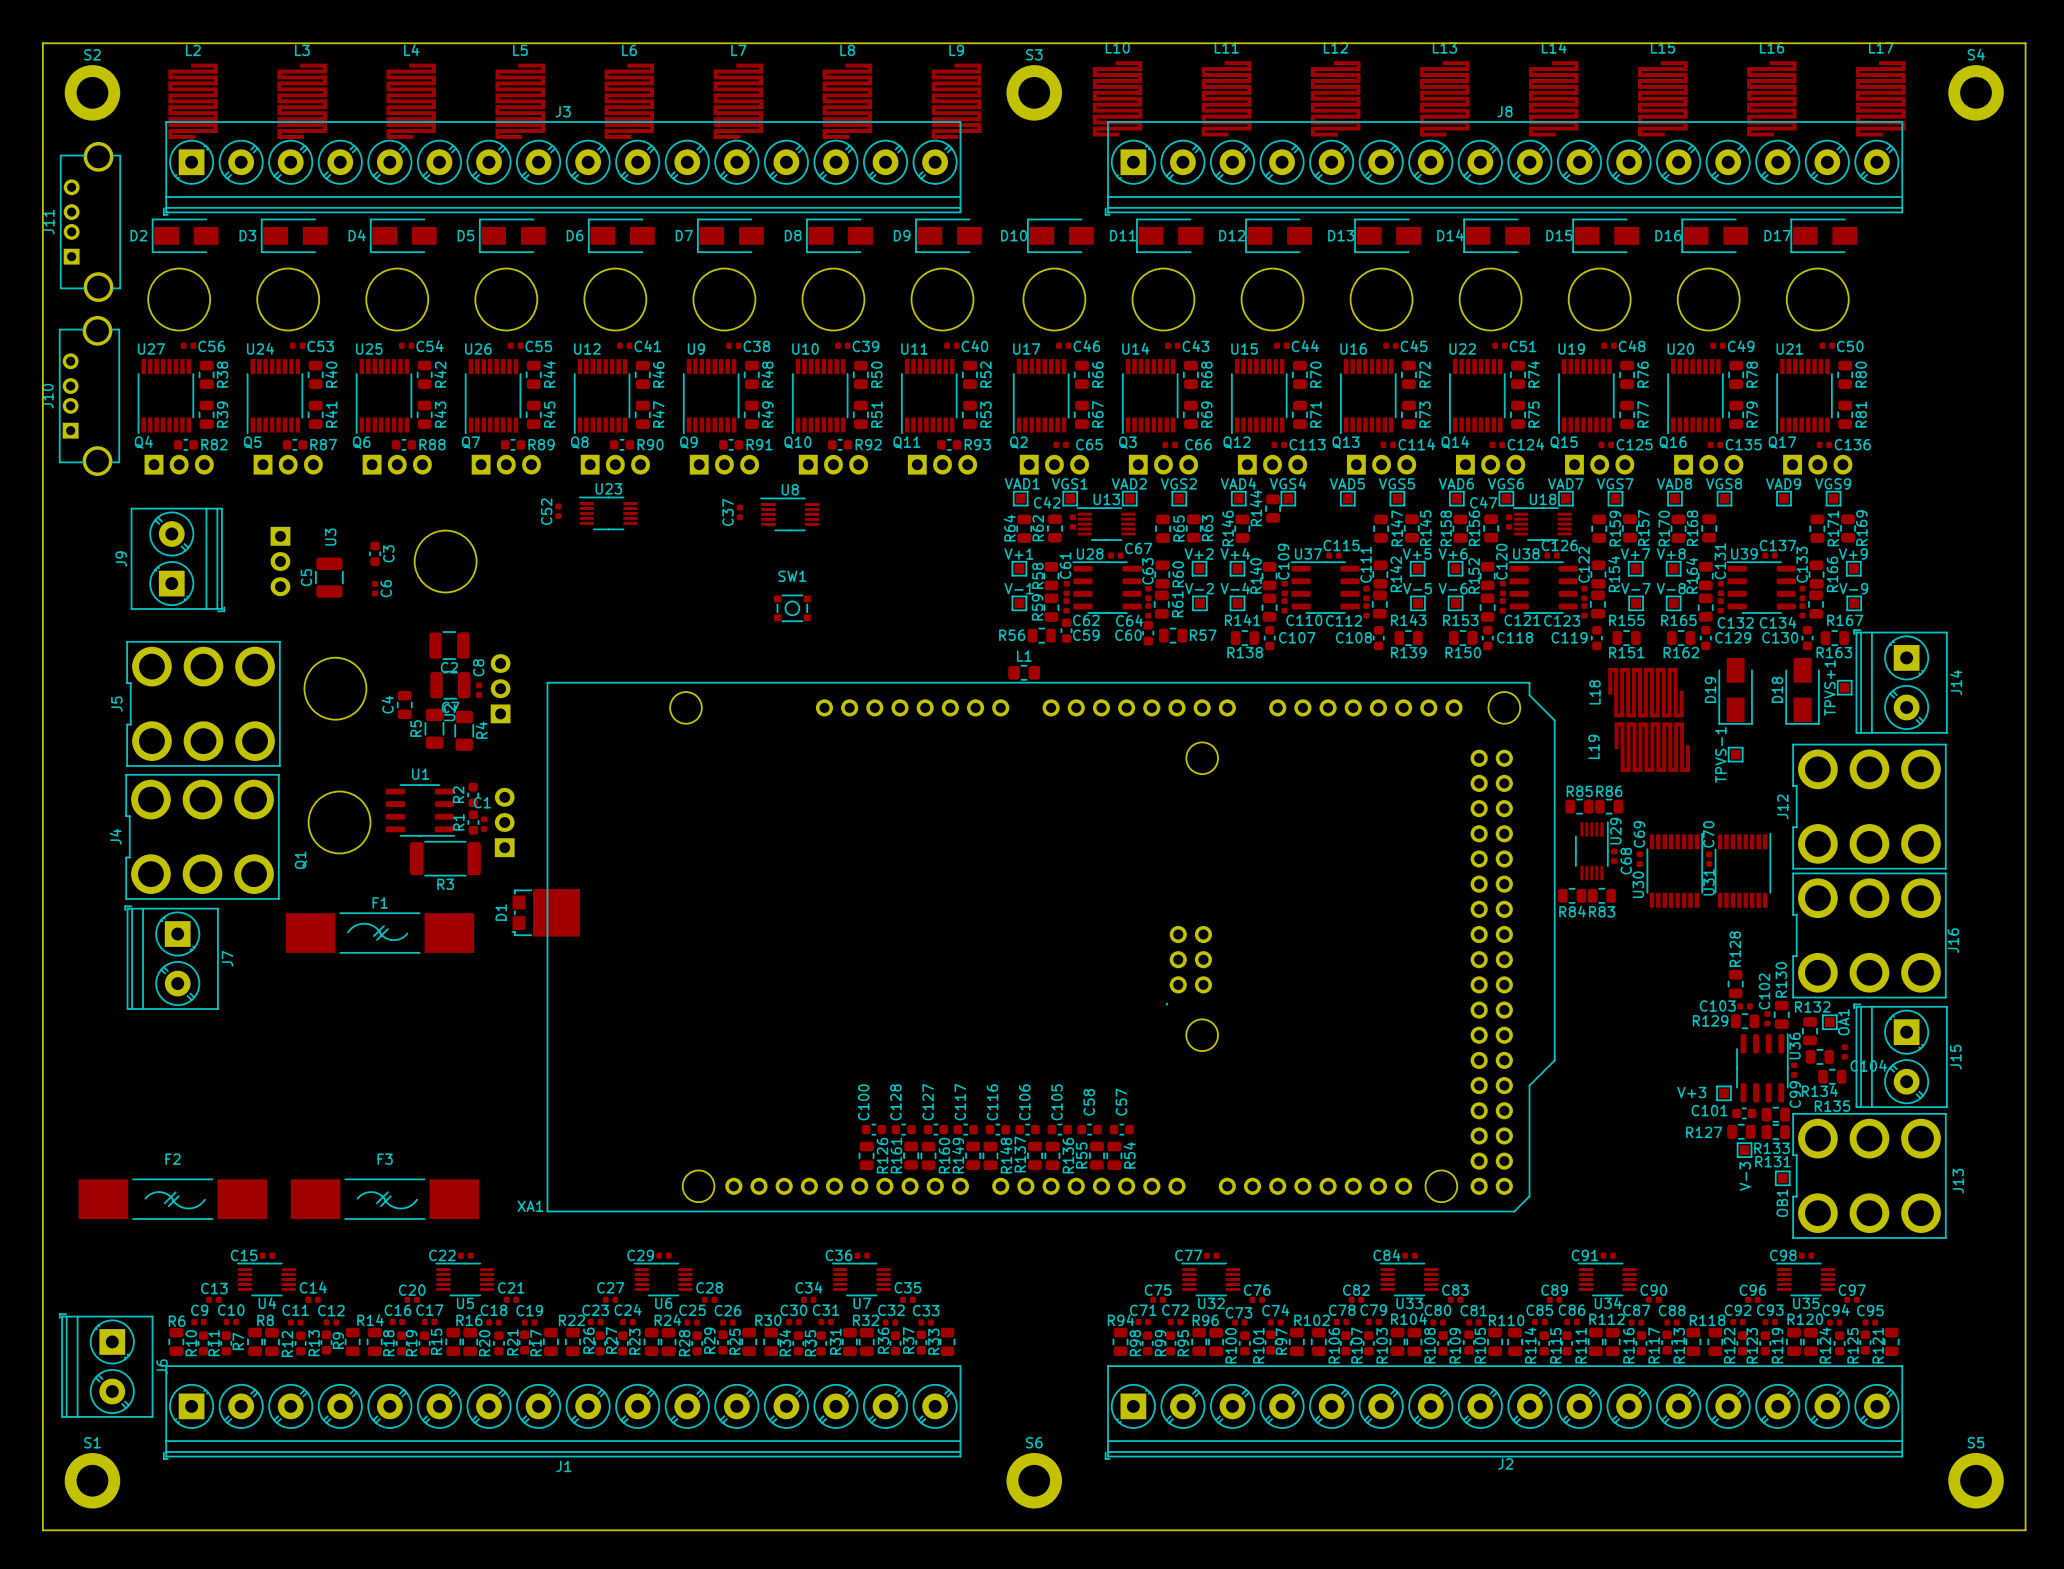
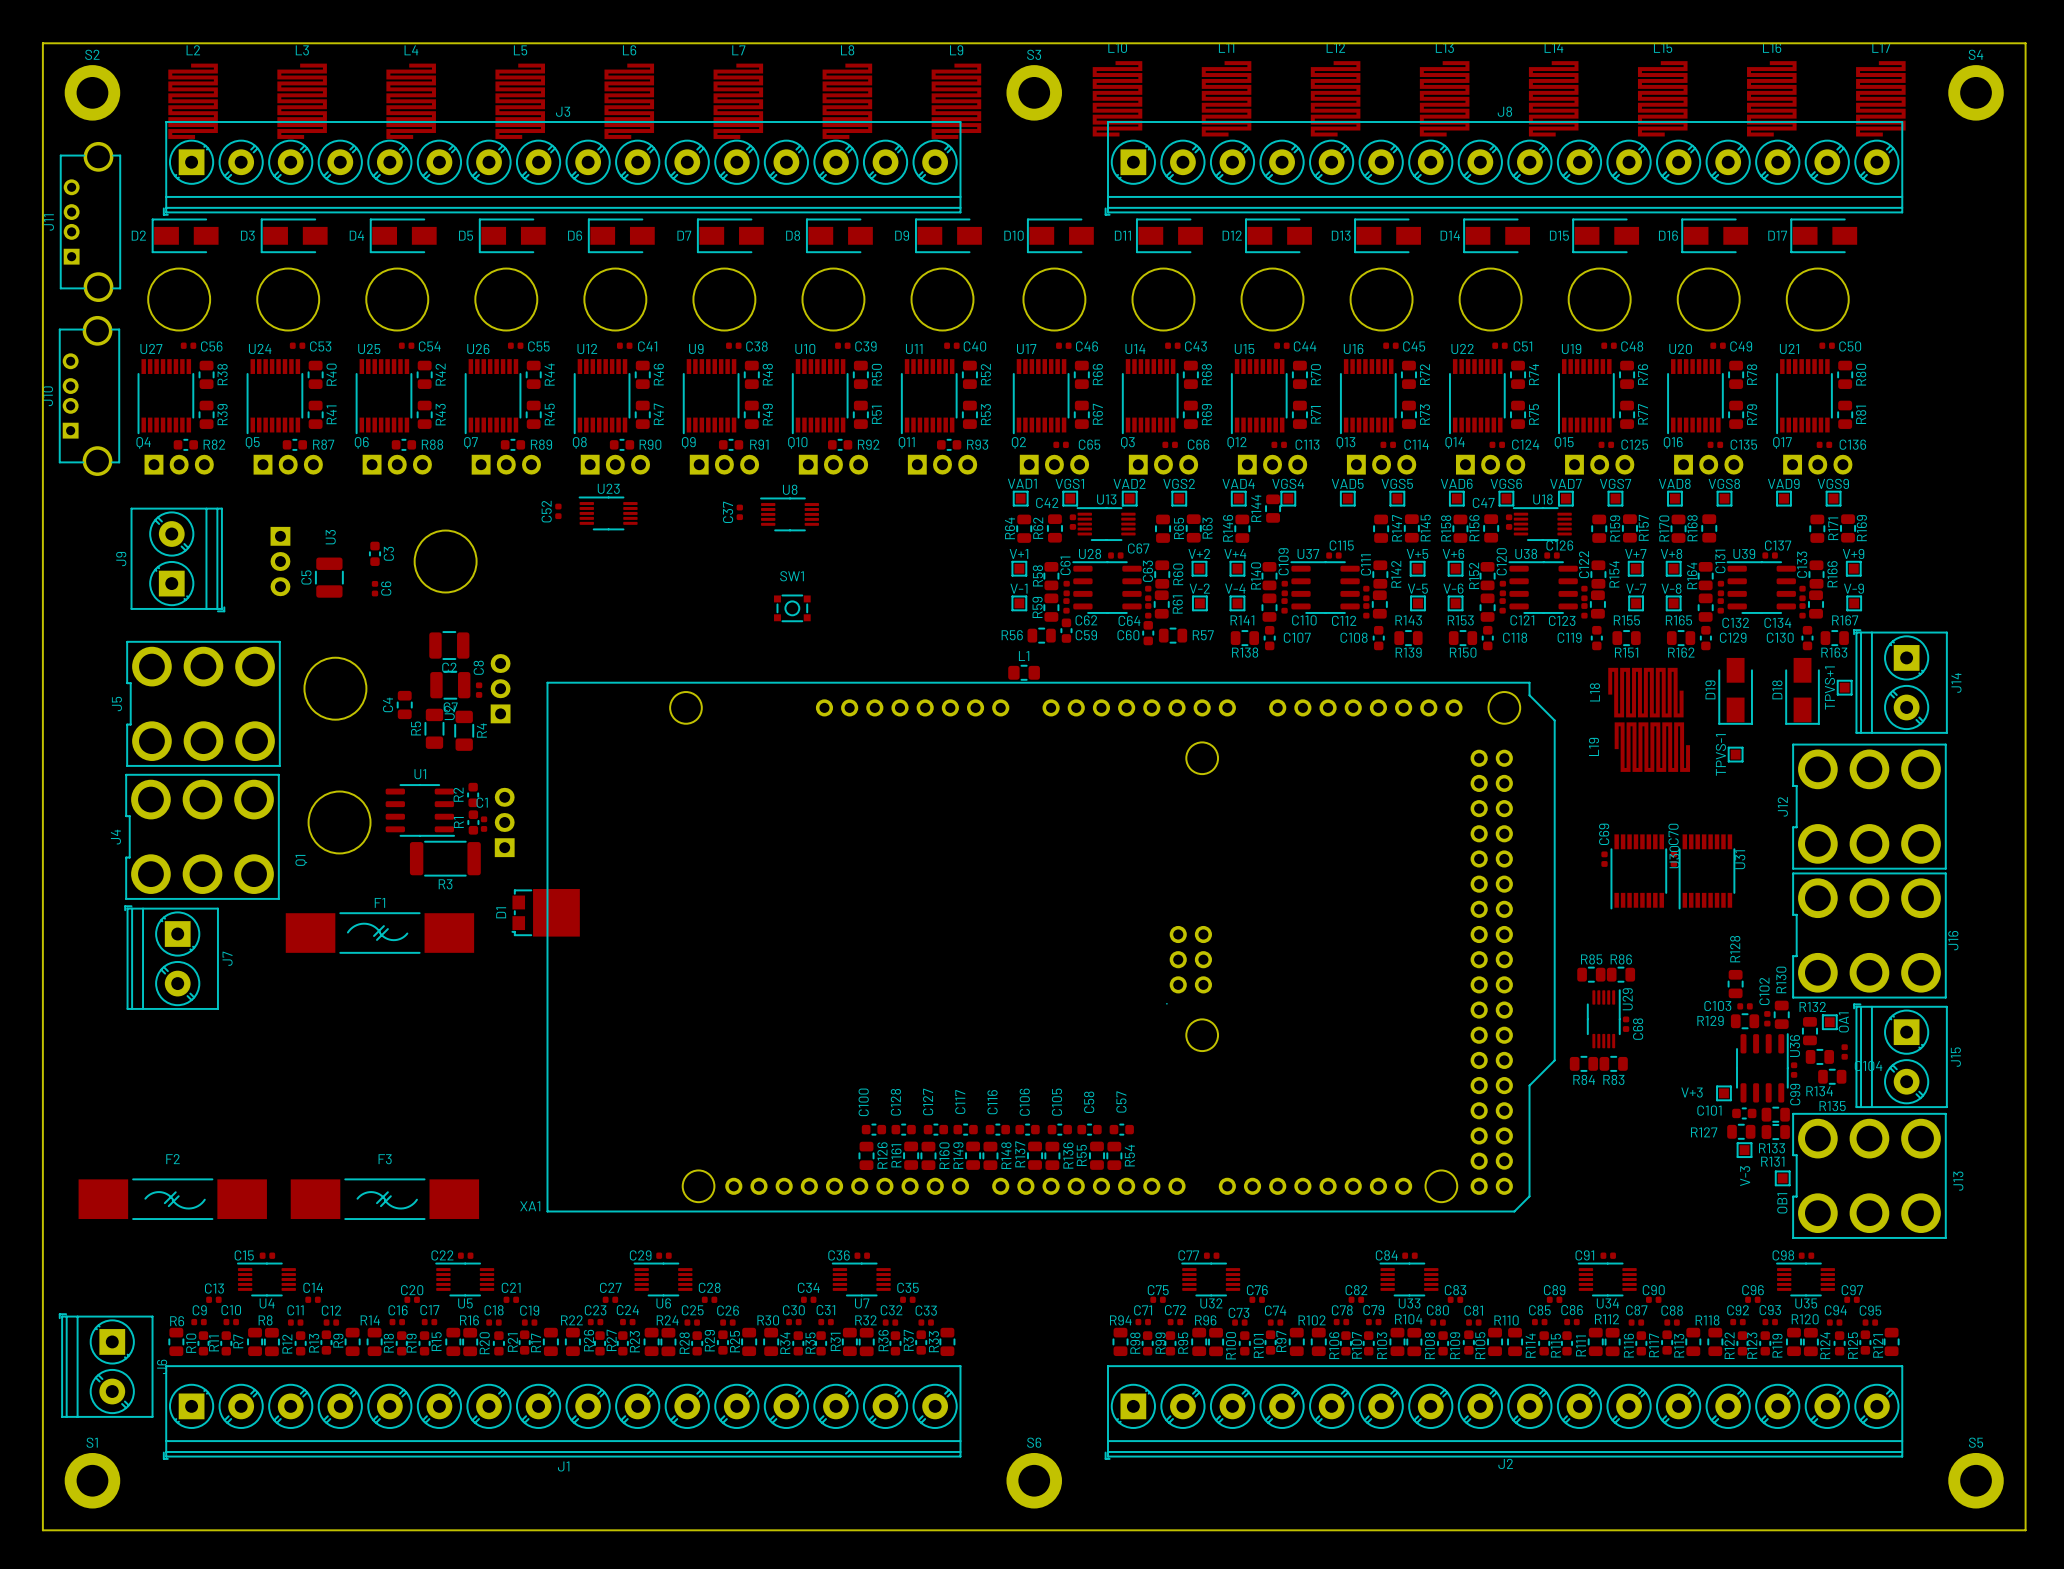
R85 position: (1579, 806) -> (1591, 974)
R86 position: (1609, 806) -> (1620, 974)
U29 position: (1591, 850) -> (1603, 1018)
C68 position: (1614, 856) -> (1626, 1024)
C69 position: (1639, 859) -> (1604, 859)
C70 position: (1709, 859) -> (1673, 859)
U30 rotation: 0° (1674, 870) -> 180° (1638, 871)
U31 rotation: 0° (1742, 870) -> 180° (1706, 871)
R84 position: (1572, 895) -> (1583, 1063)
R83 position: (1601, 895) -> (1613, 1063)

